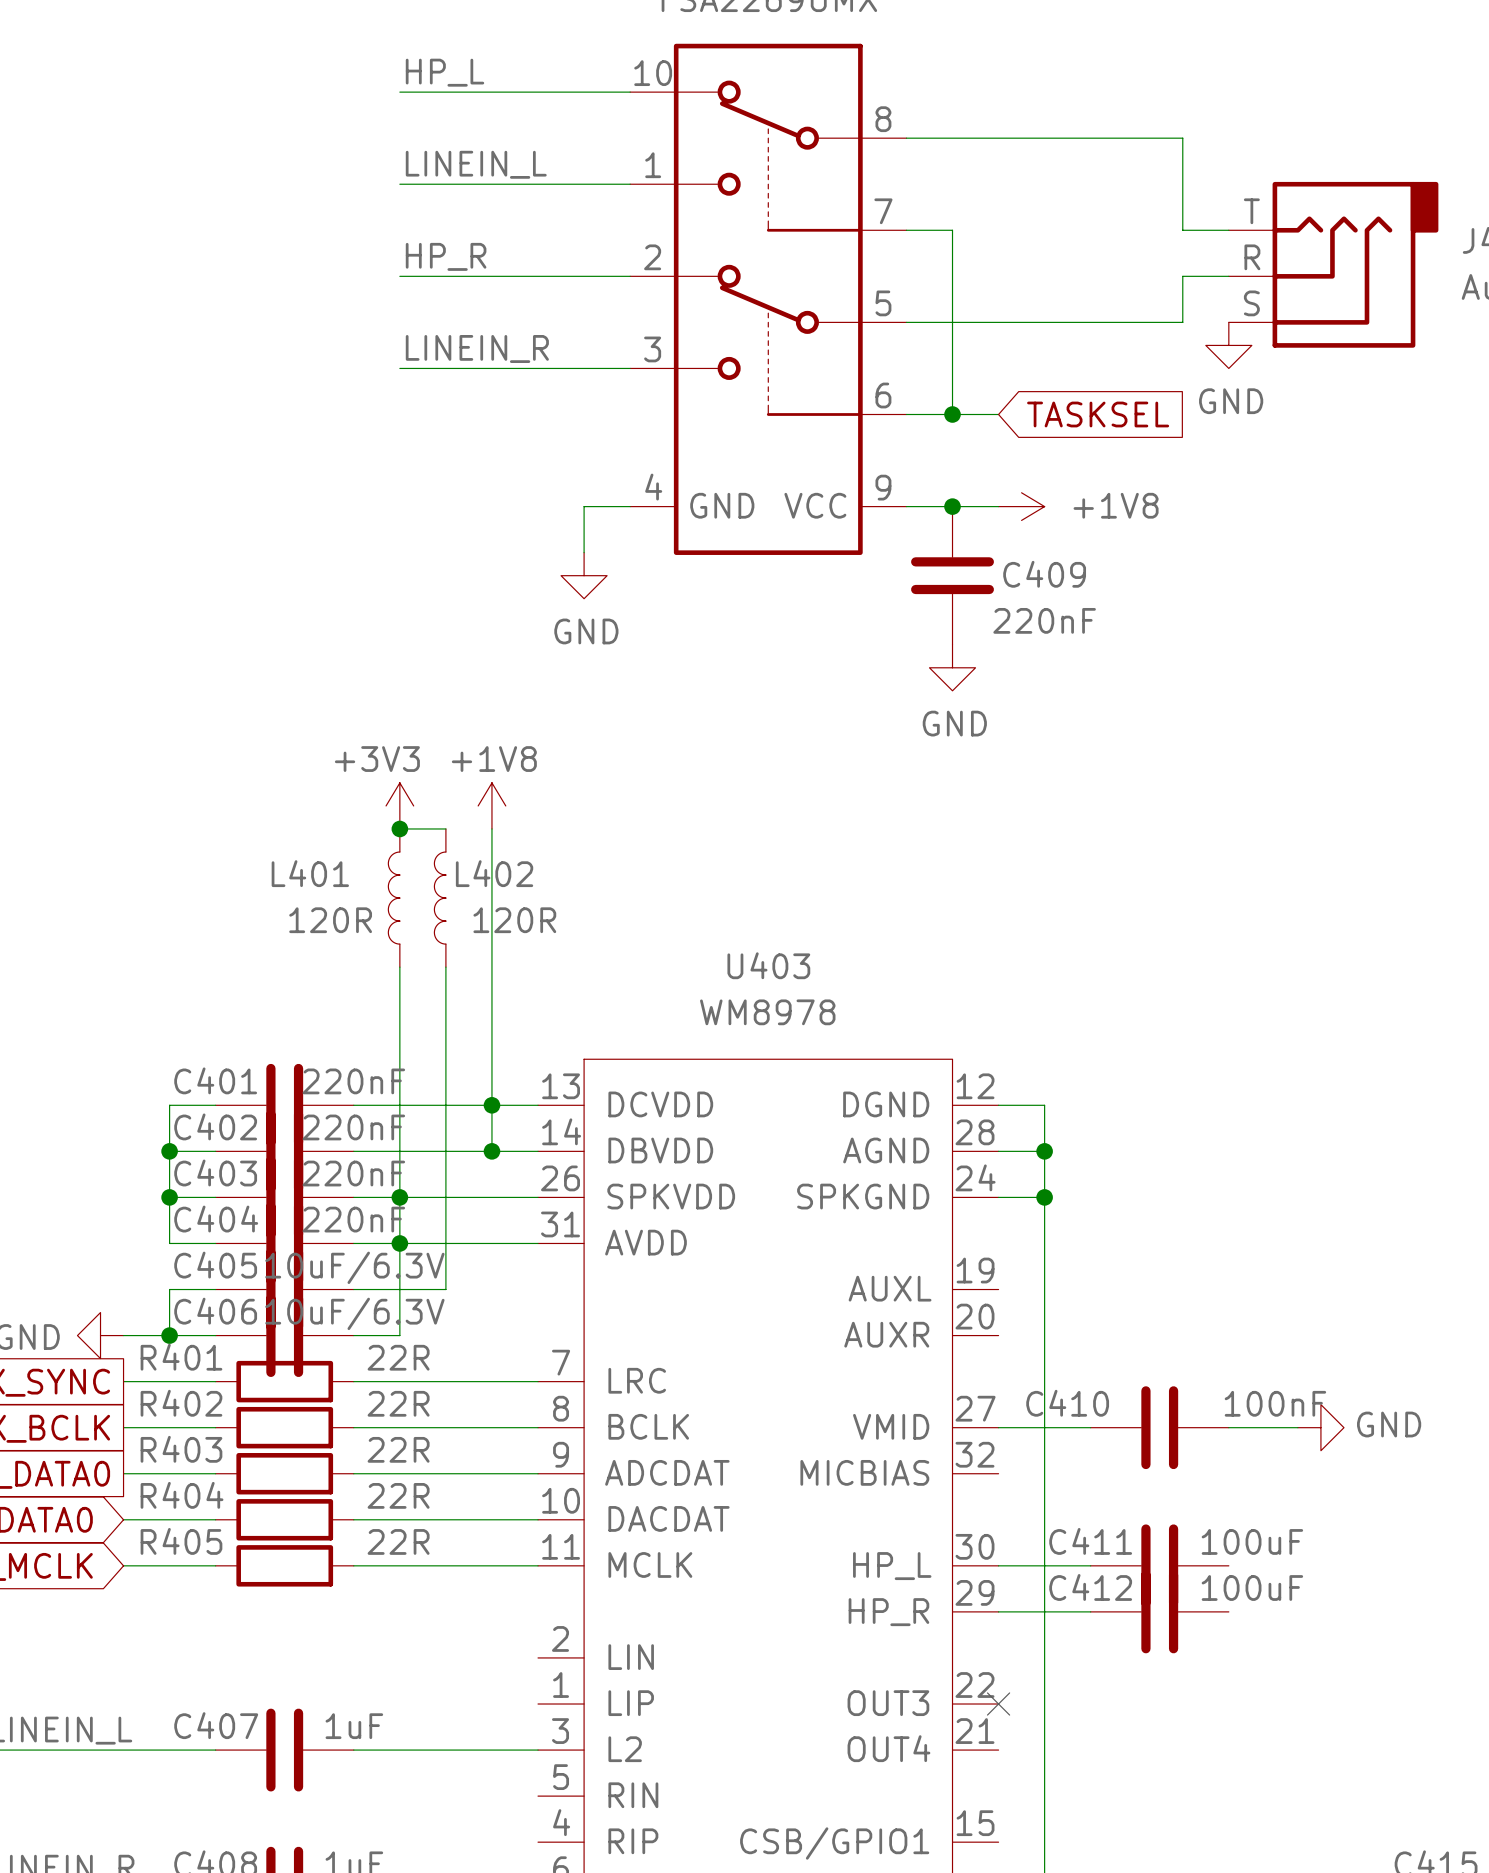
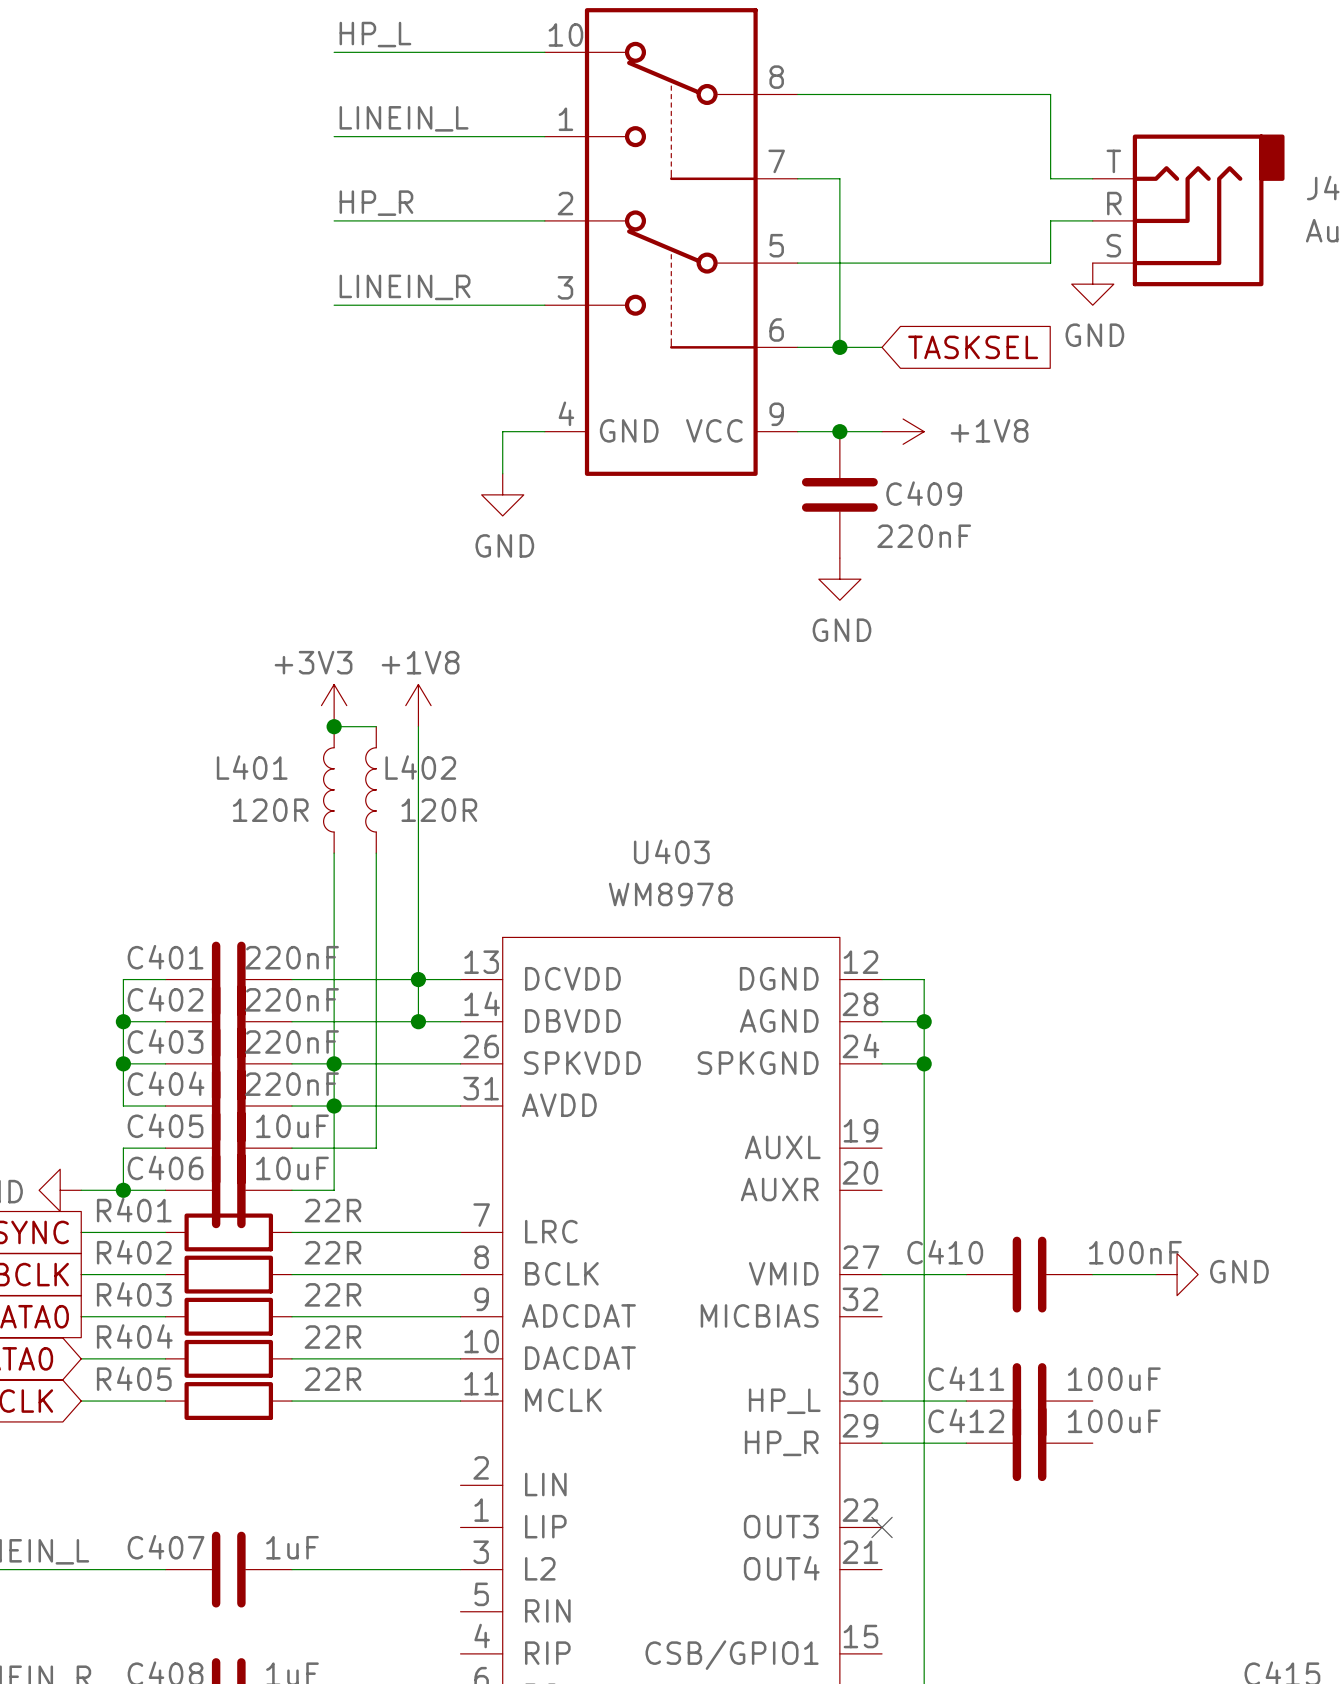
C405 value: 10uF/6.3V (354, 1267) -> 10uF (292, 1126)
C406 value: 10uF/6.3V (354, 1313) -> 10uF (292, 1168)

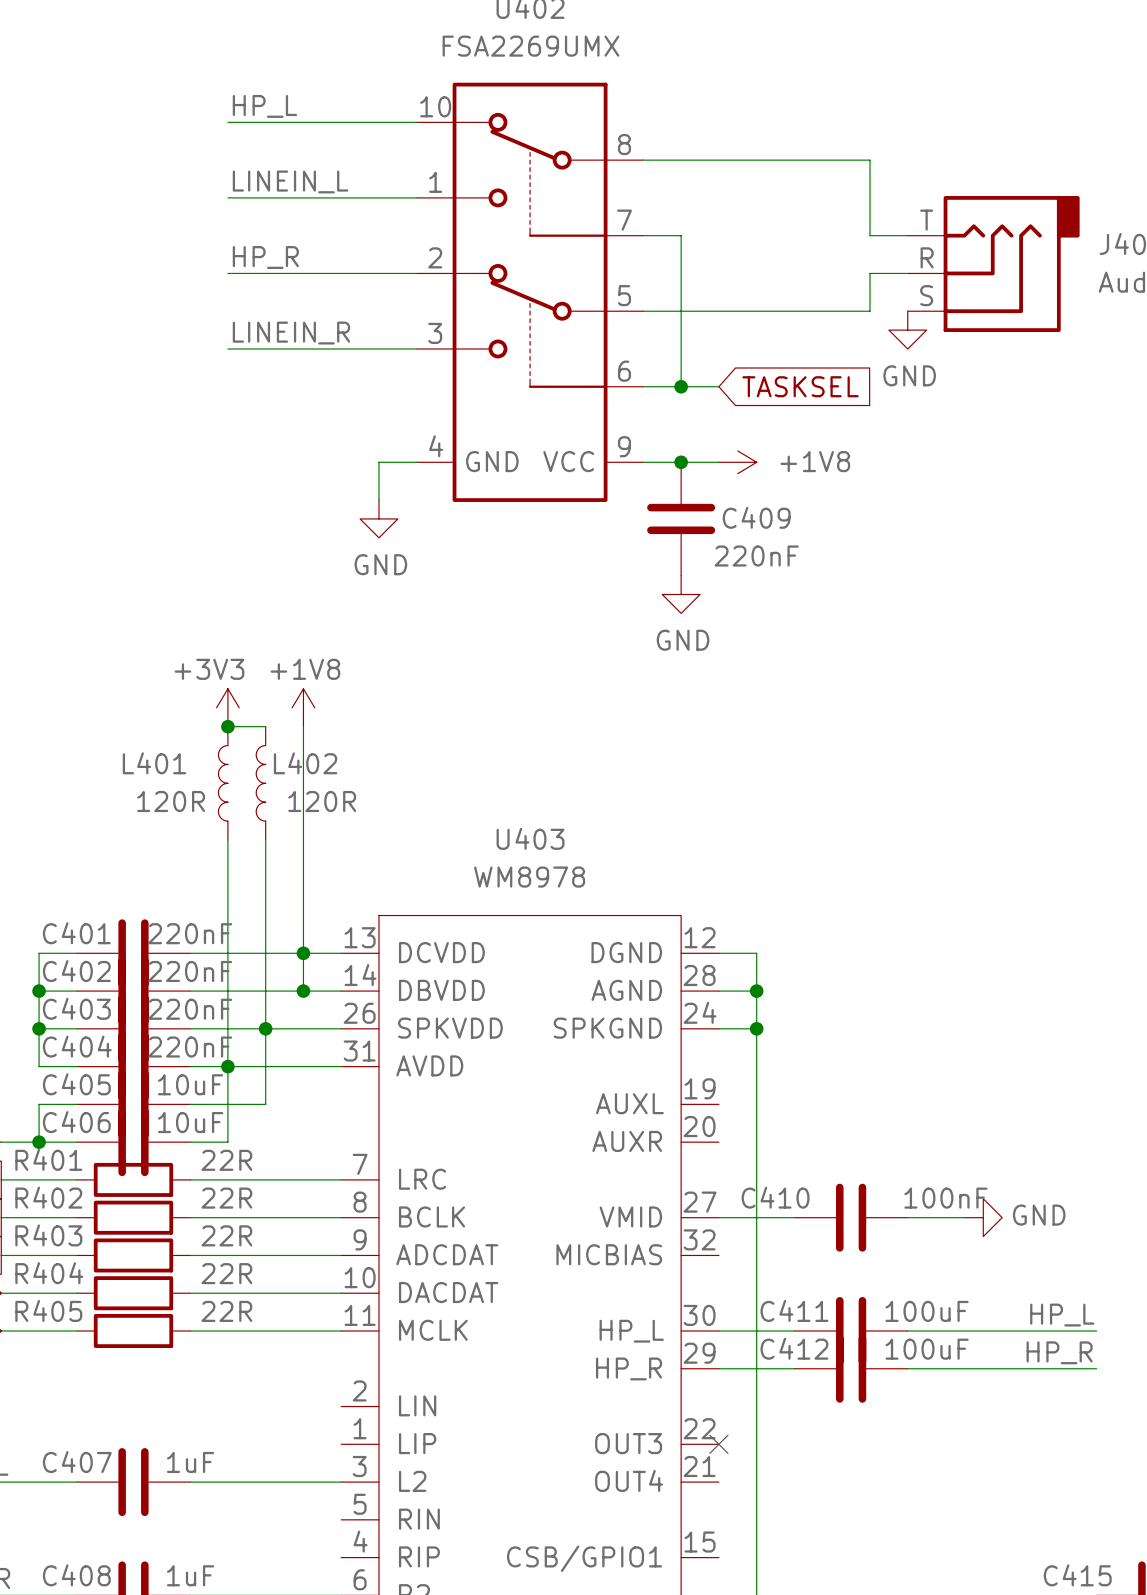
junction position: (334, 1063) -> (265, 1028)
label: none -> HP_L (1062, 1315)
wire: none -> (907, 1330) (1096, 1330)
label: none -> HP_R (1059, 1352)
wire: none -> (907, 1368) (1096, 1368)

